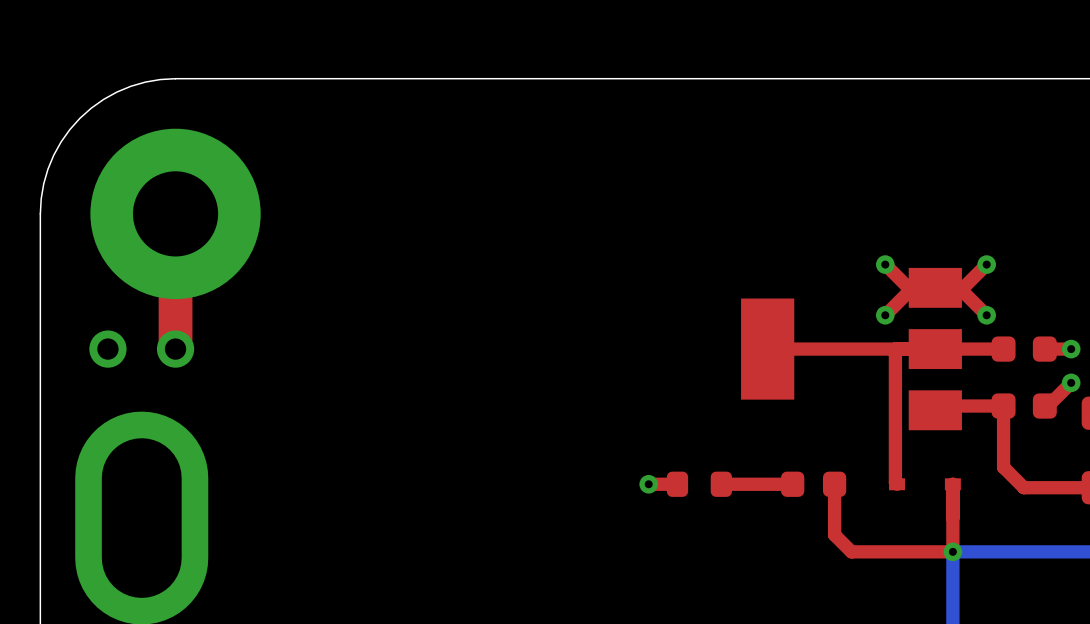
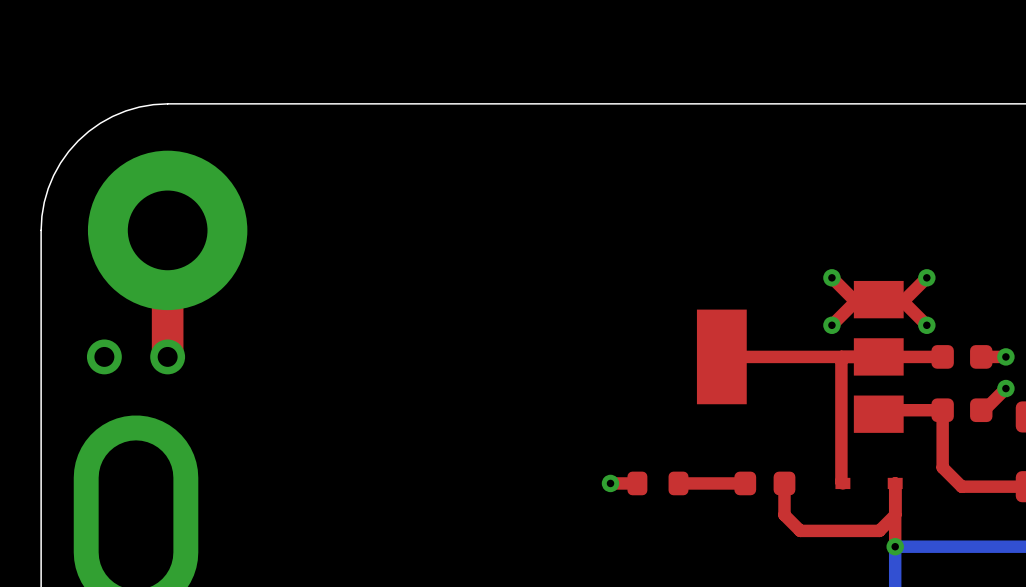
top track: (834, 518) (834, 534) (851, 551) (952, 551) -> (784, 515) (800, 530) (879, 530) (895, 515)

